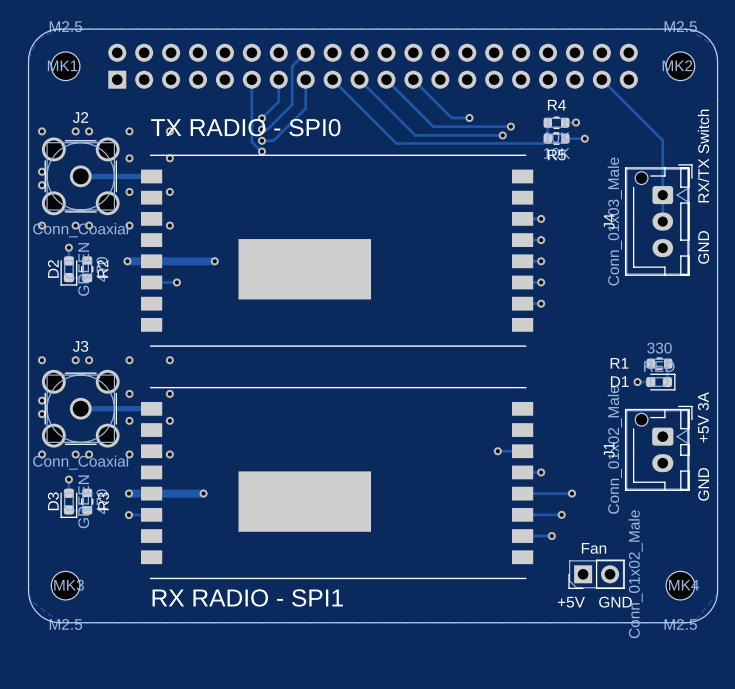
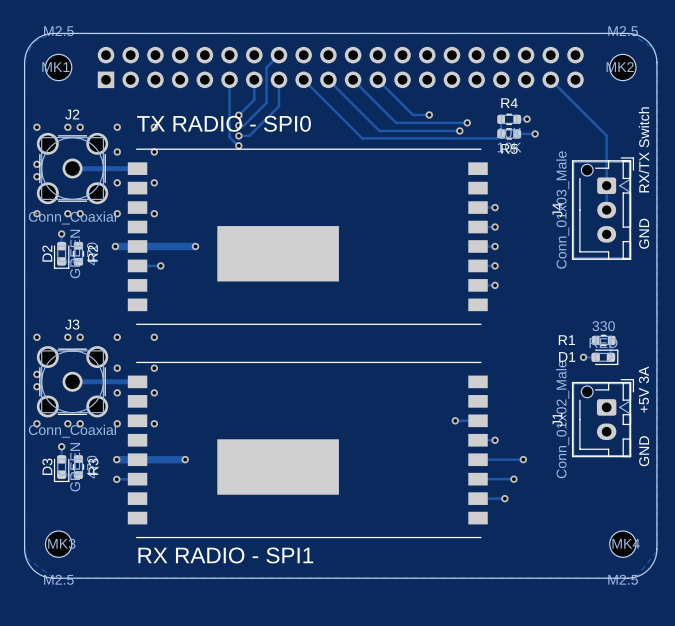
Fan: Conn_01x02_Male (596, 574) -> none
text: +5V (571, 602) -> none
text: GND (615, 602) -> none

